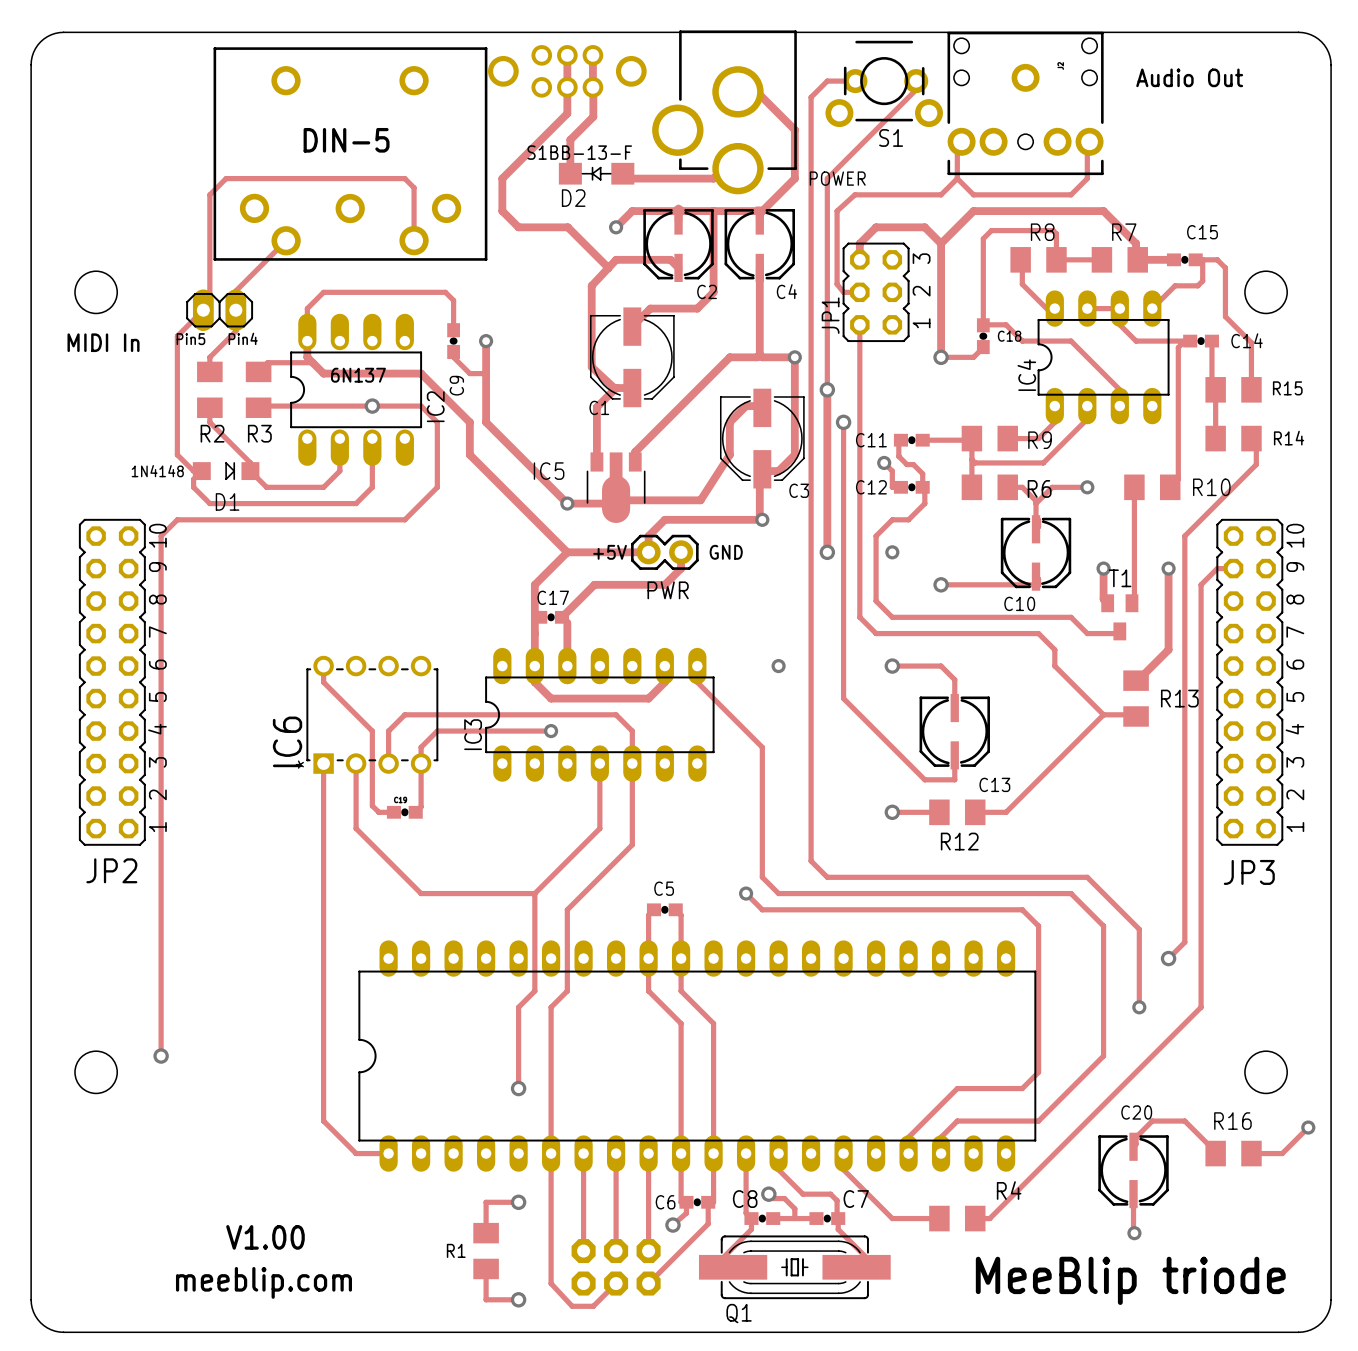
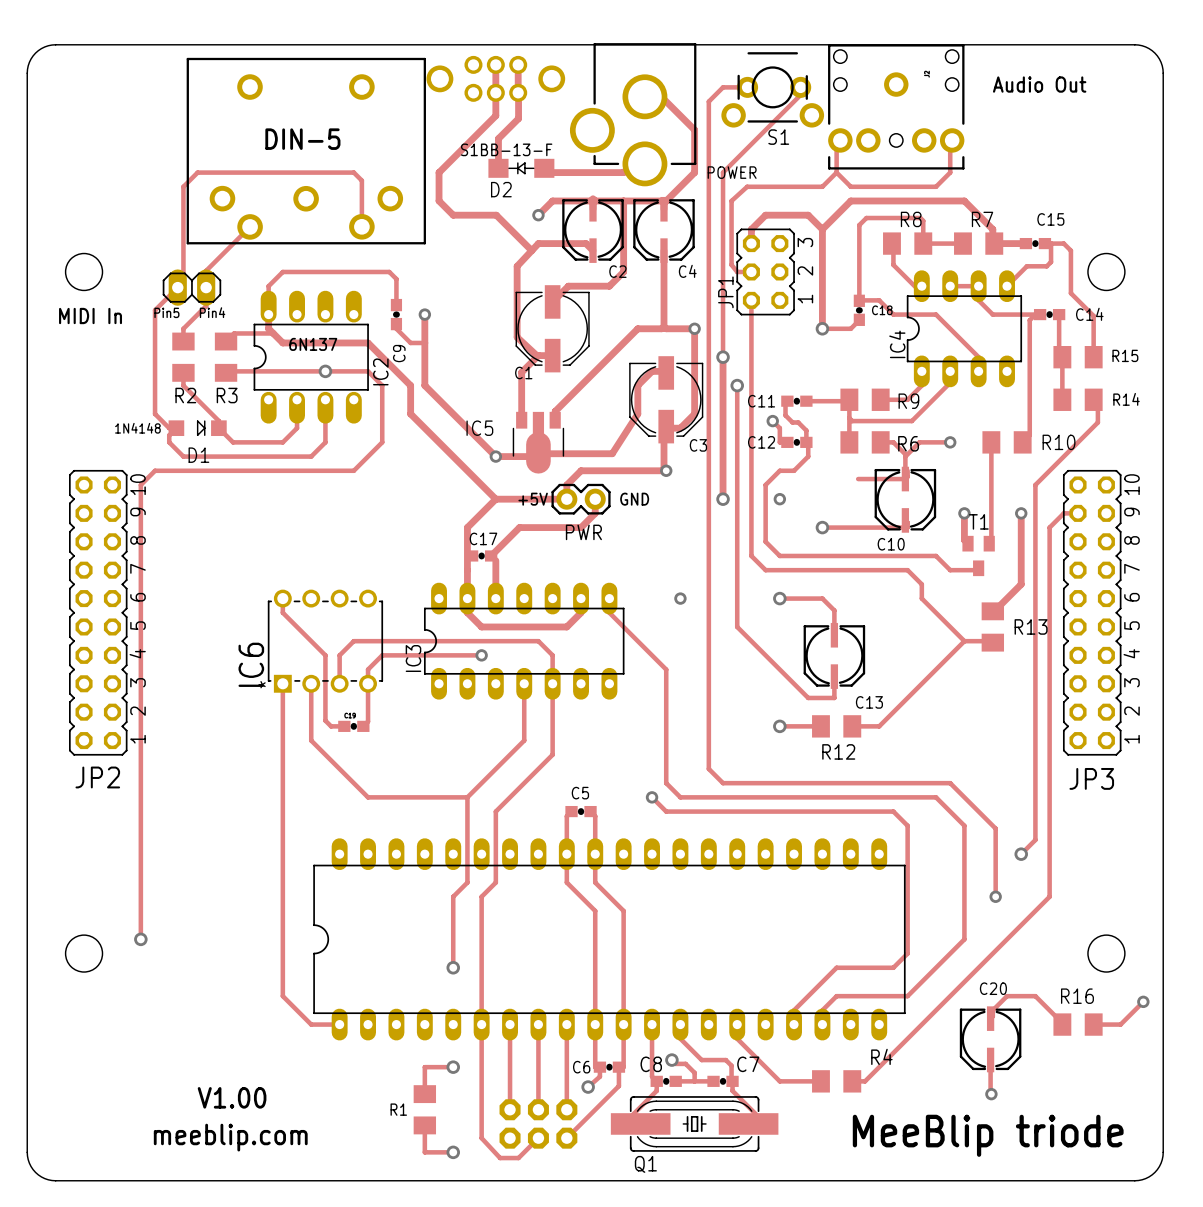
track: none -> (858, 479) (905, 479)

